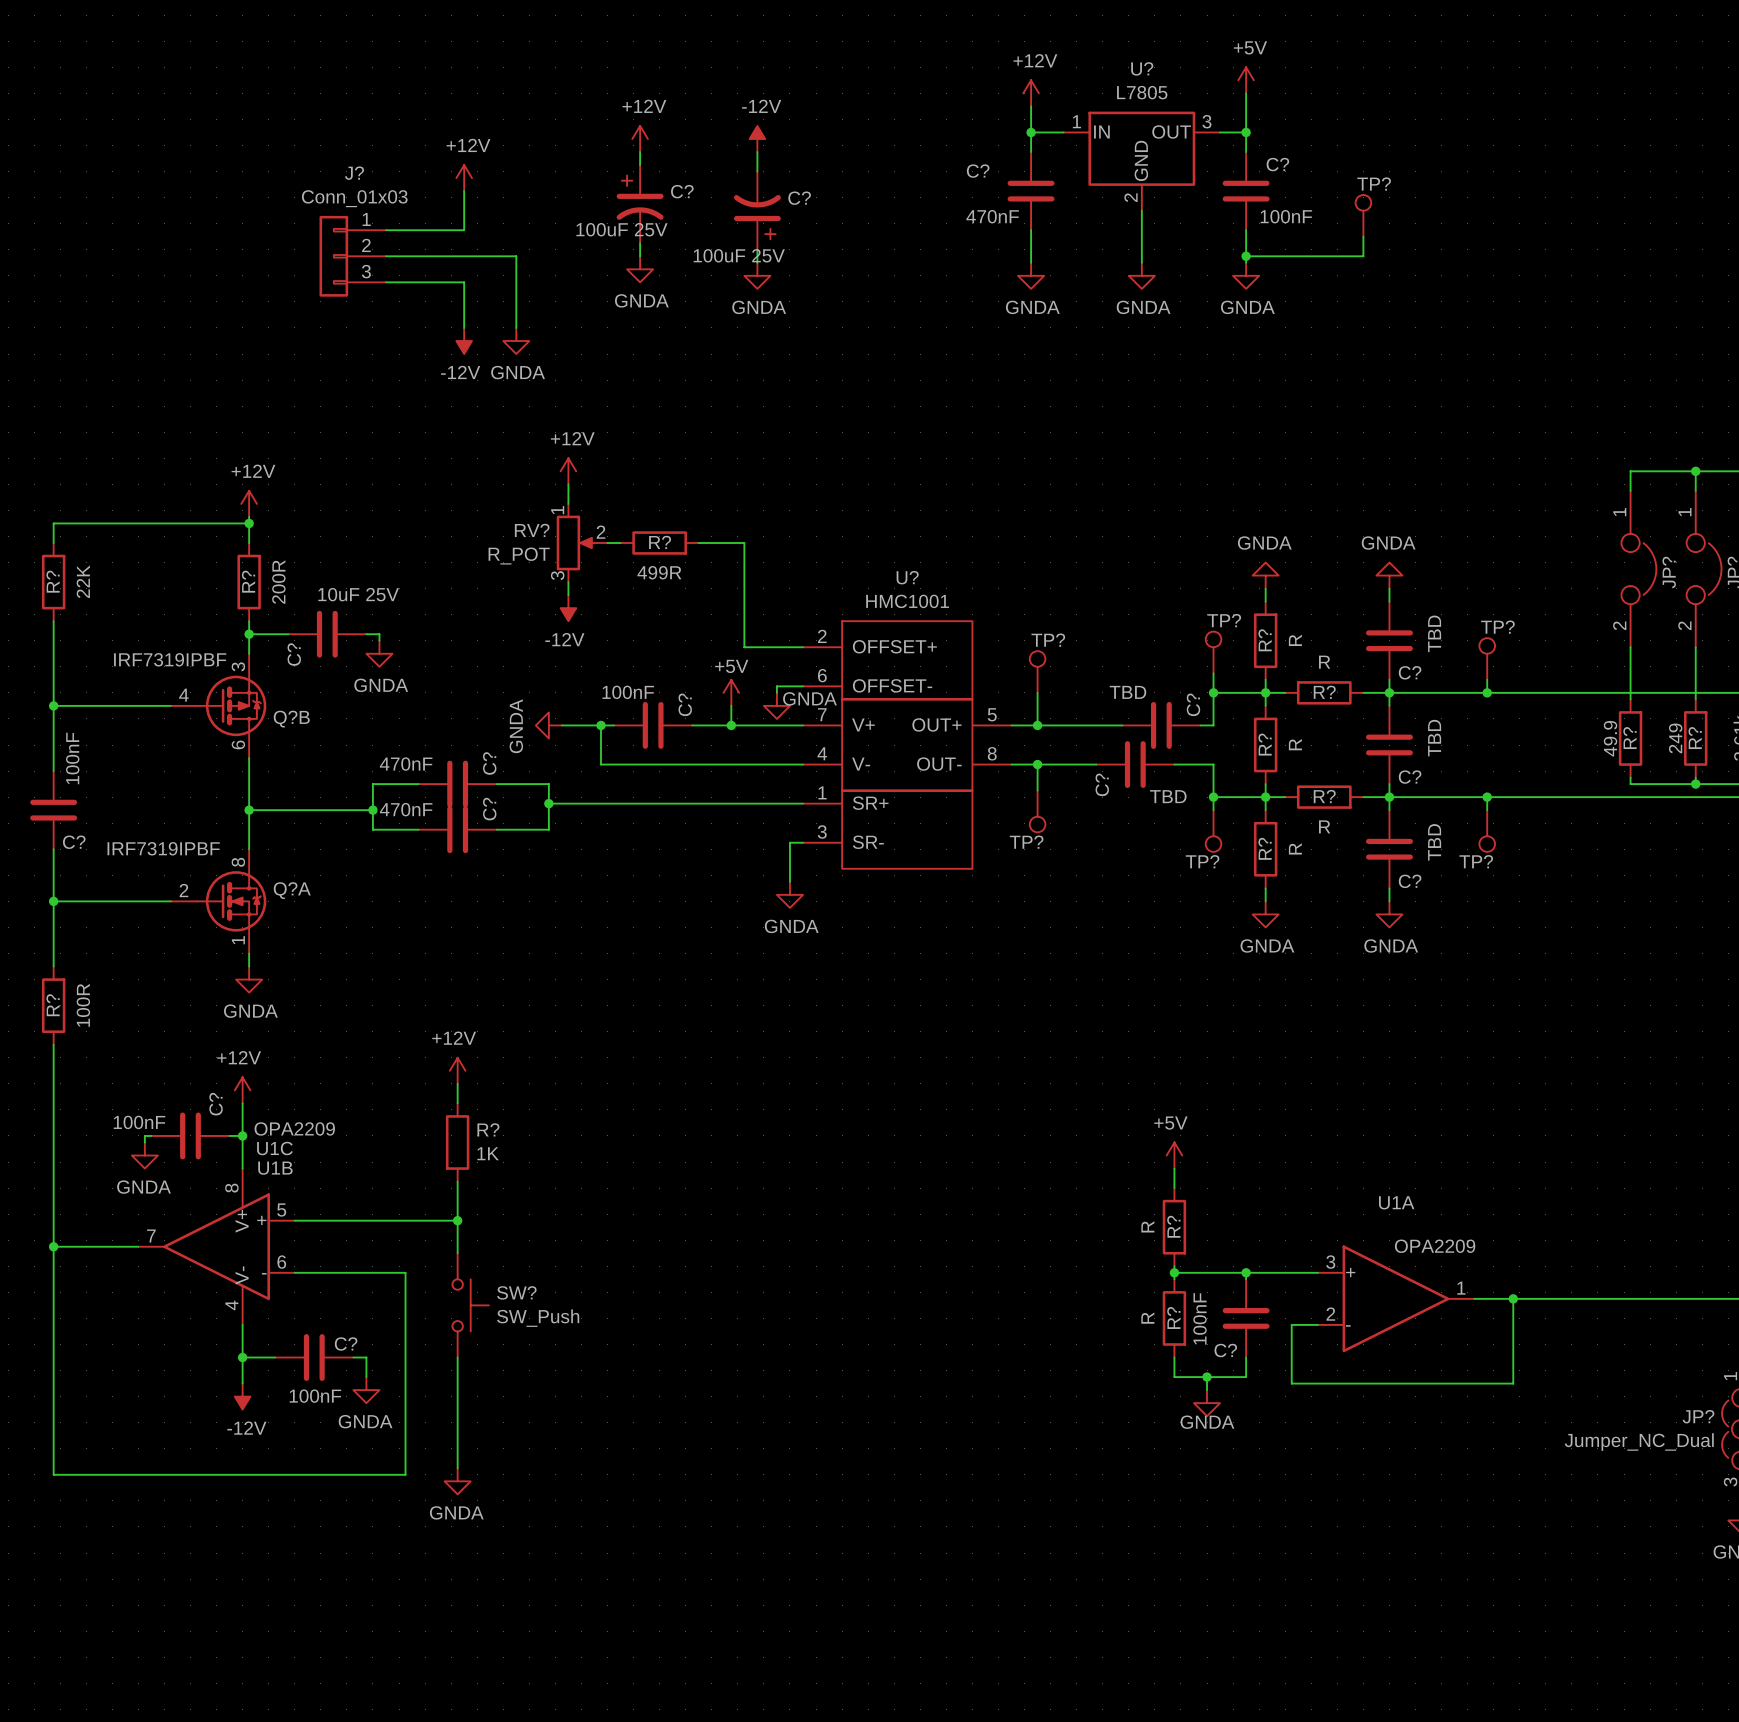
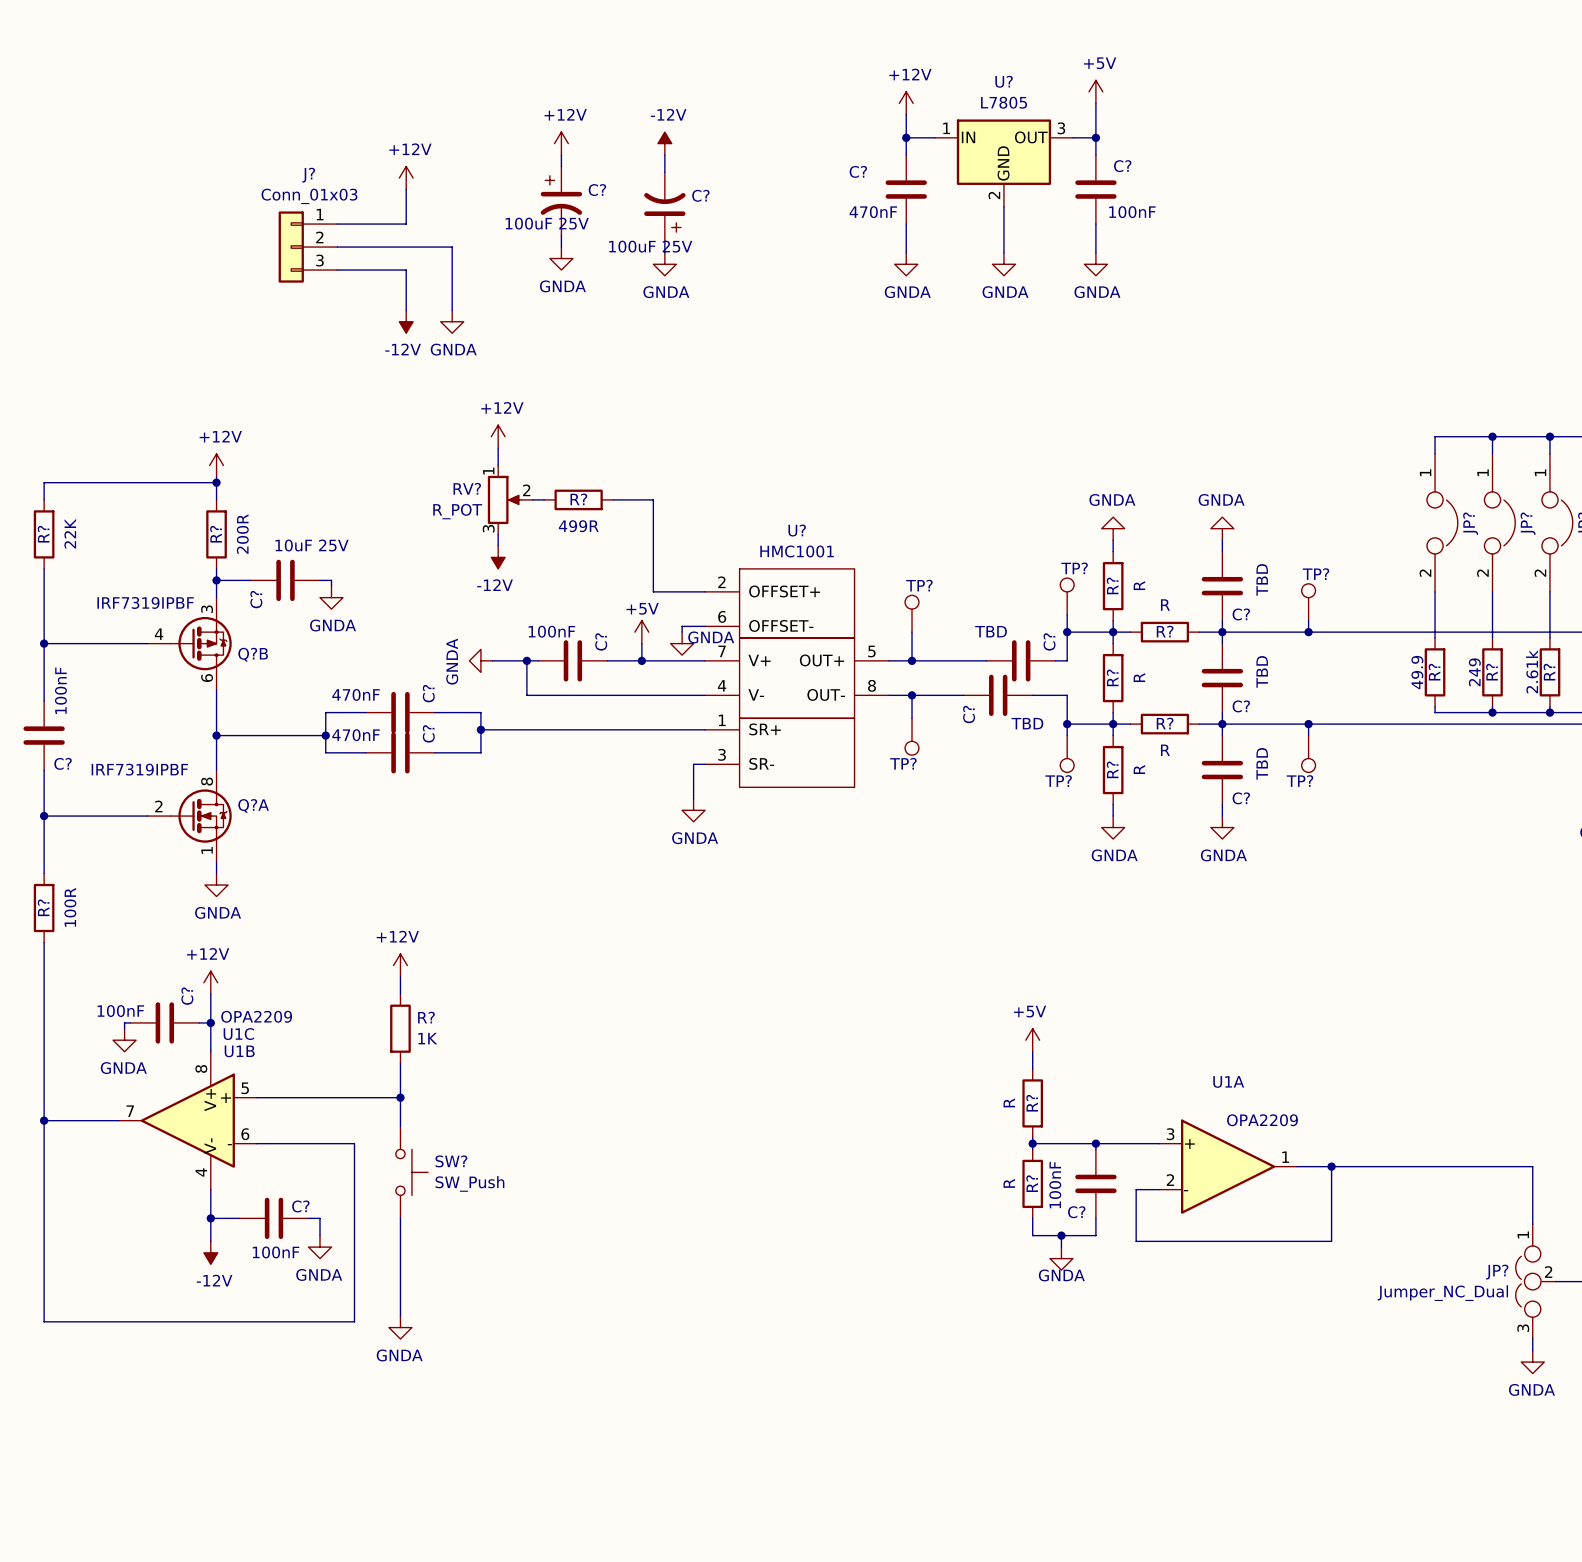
TP?: (1363, 215) -> none
wire: (1363, 236) (1363, 256) (1246, 256) -> none
junction: (1246, 256) -> none

